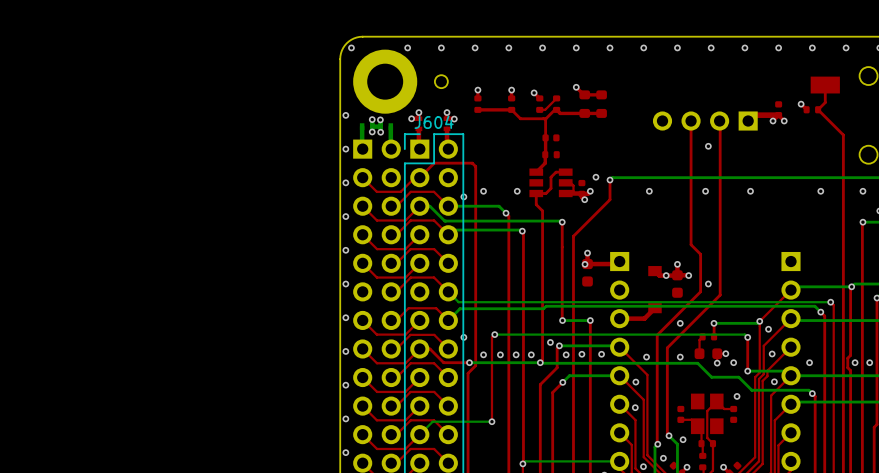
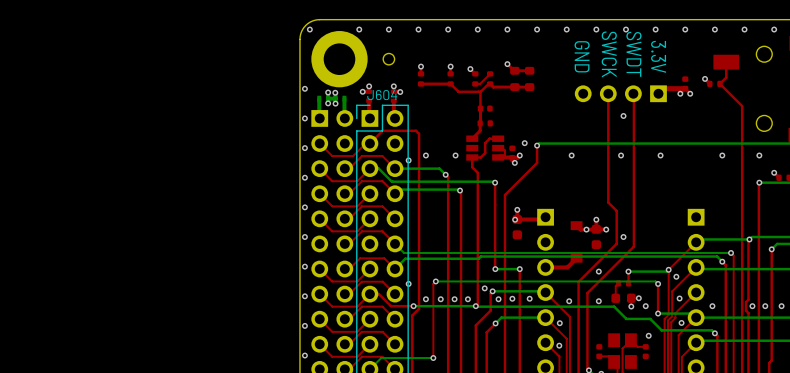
text: none -> SWCK (609, 54)
text: none -> SWDT (633, 54)
text: none -> GND (582, 56)
text: none -> 3.3V (658, 56)

